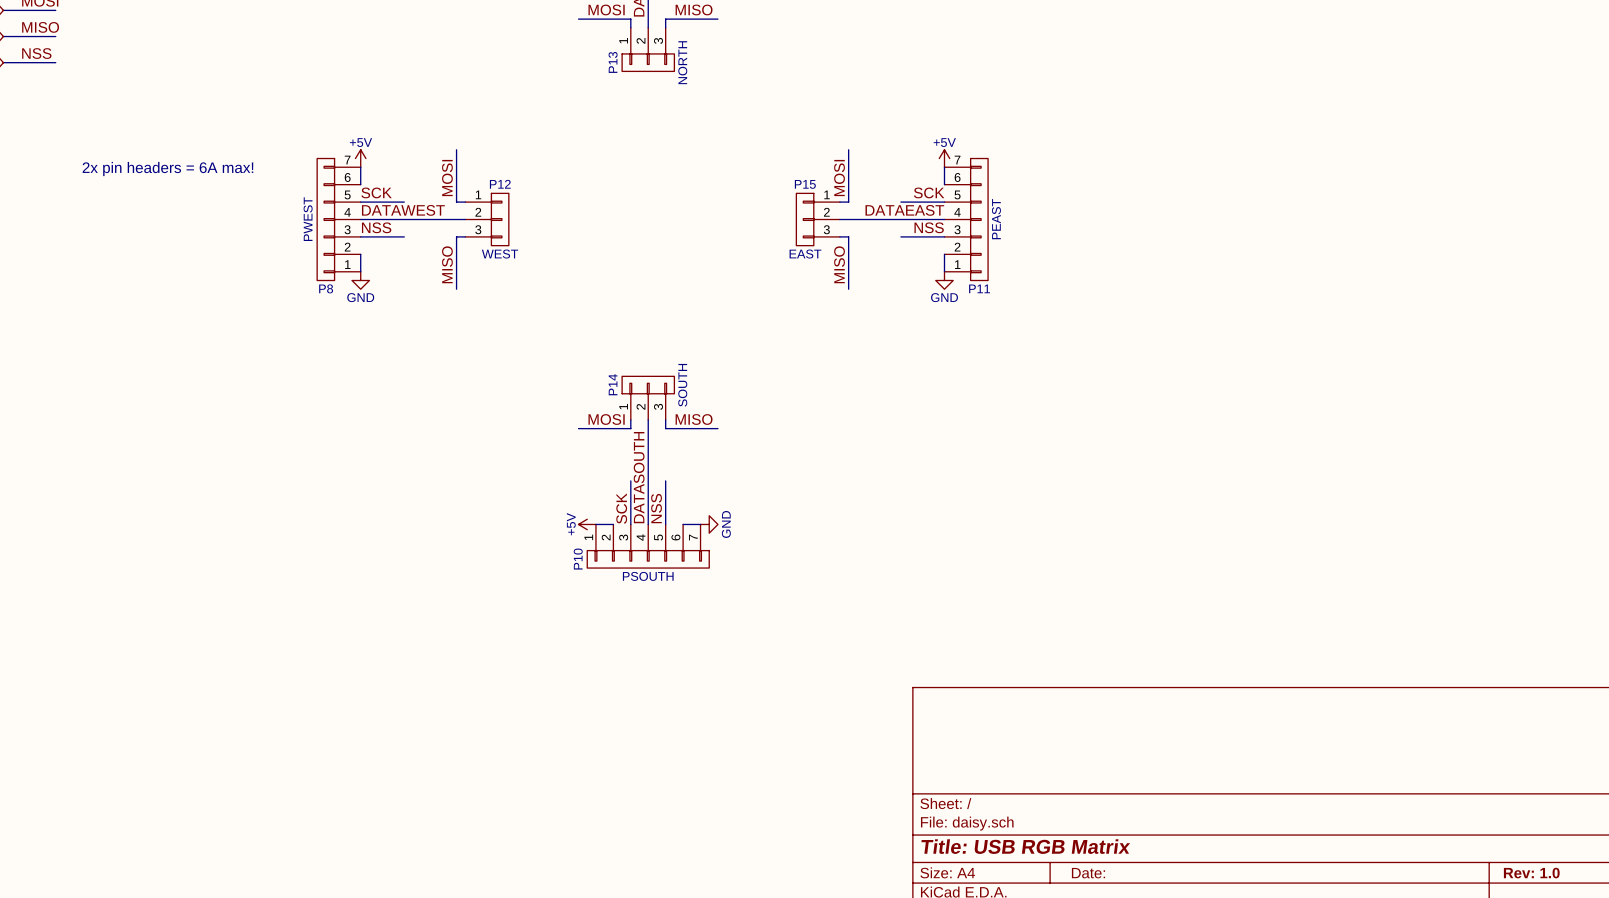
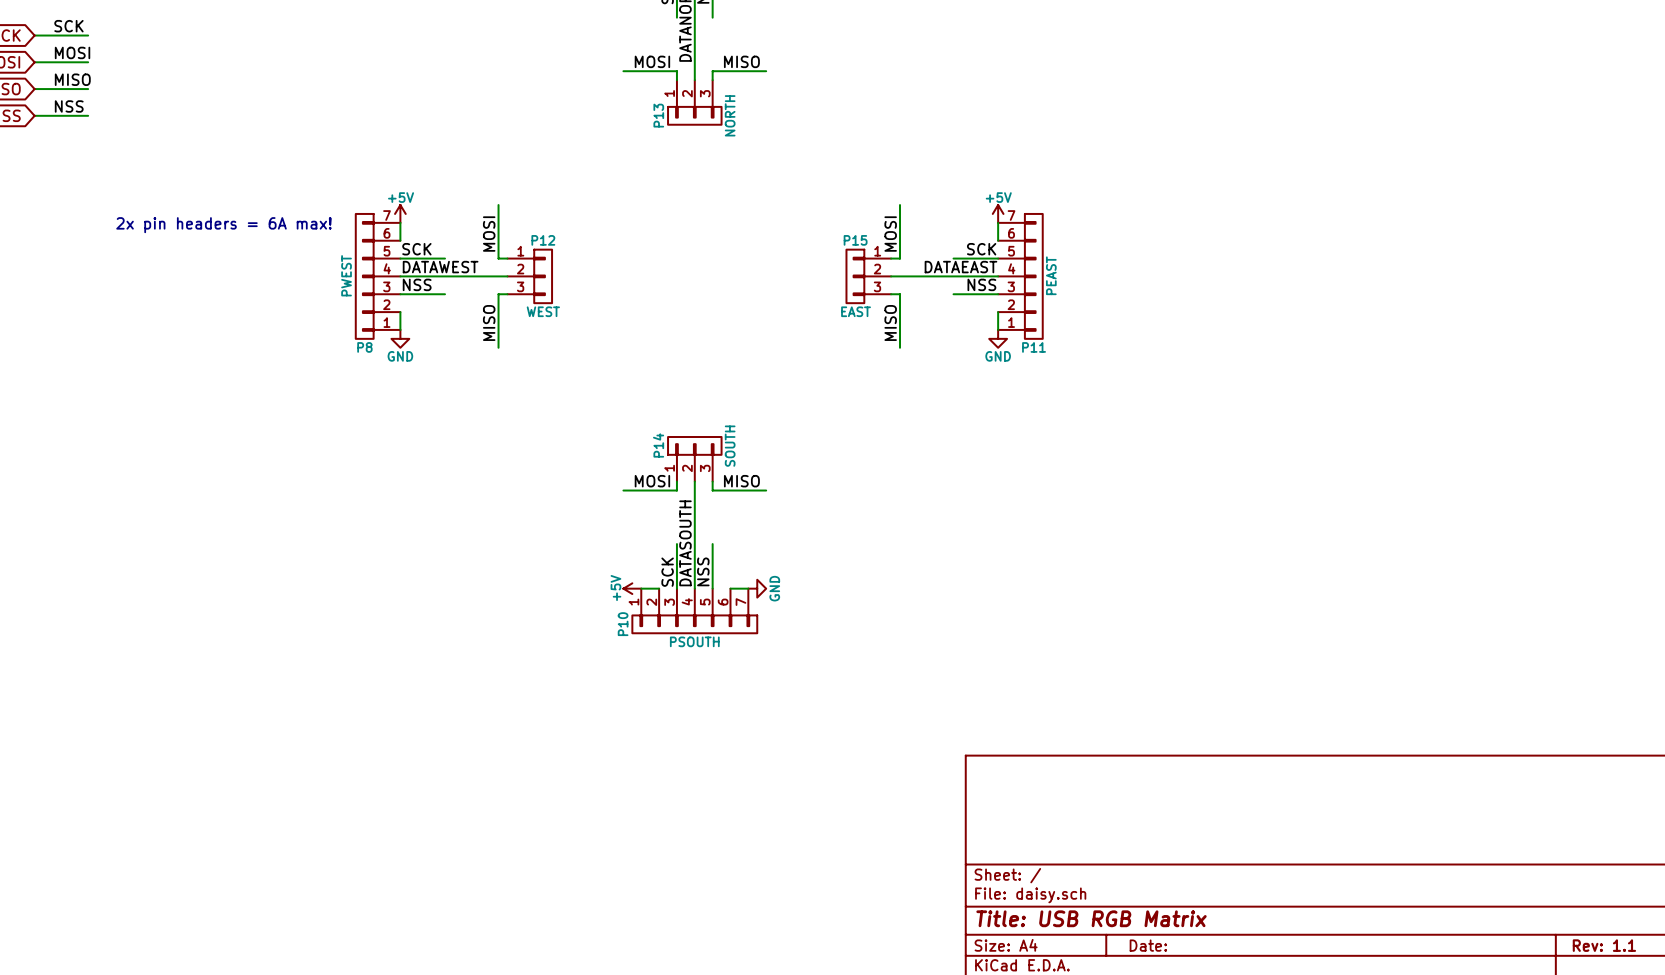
title block: Rev: 1.0 (1531, 873) -> Rev: 1.1 (1604, 945)

